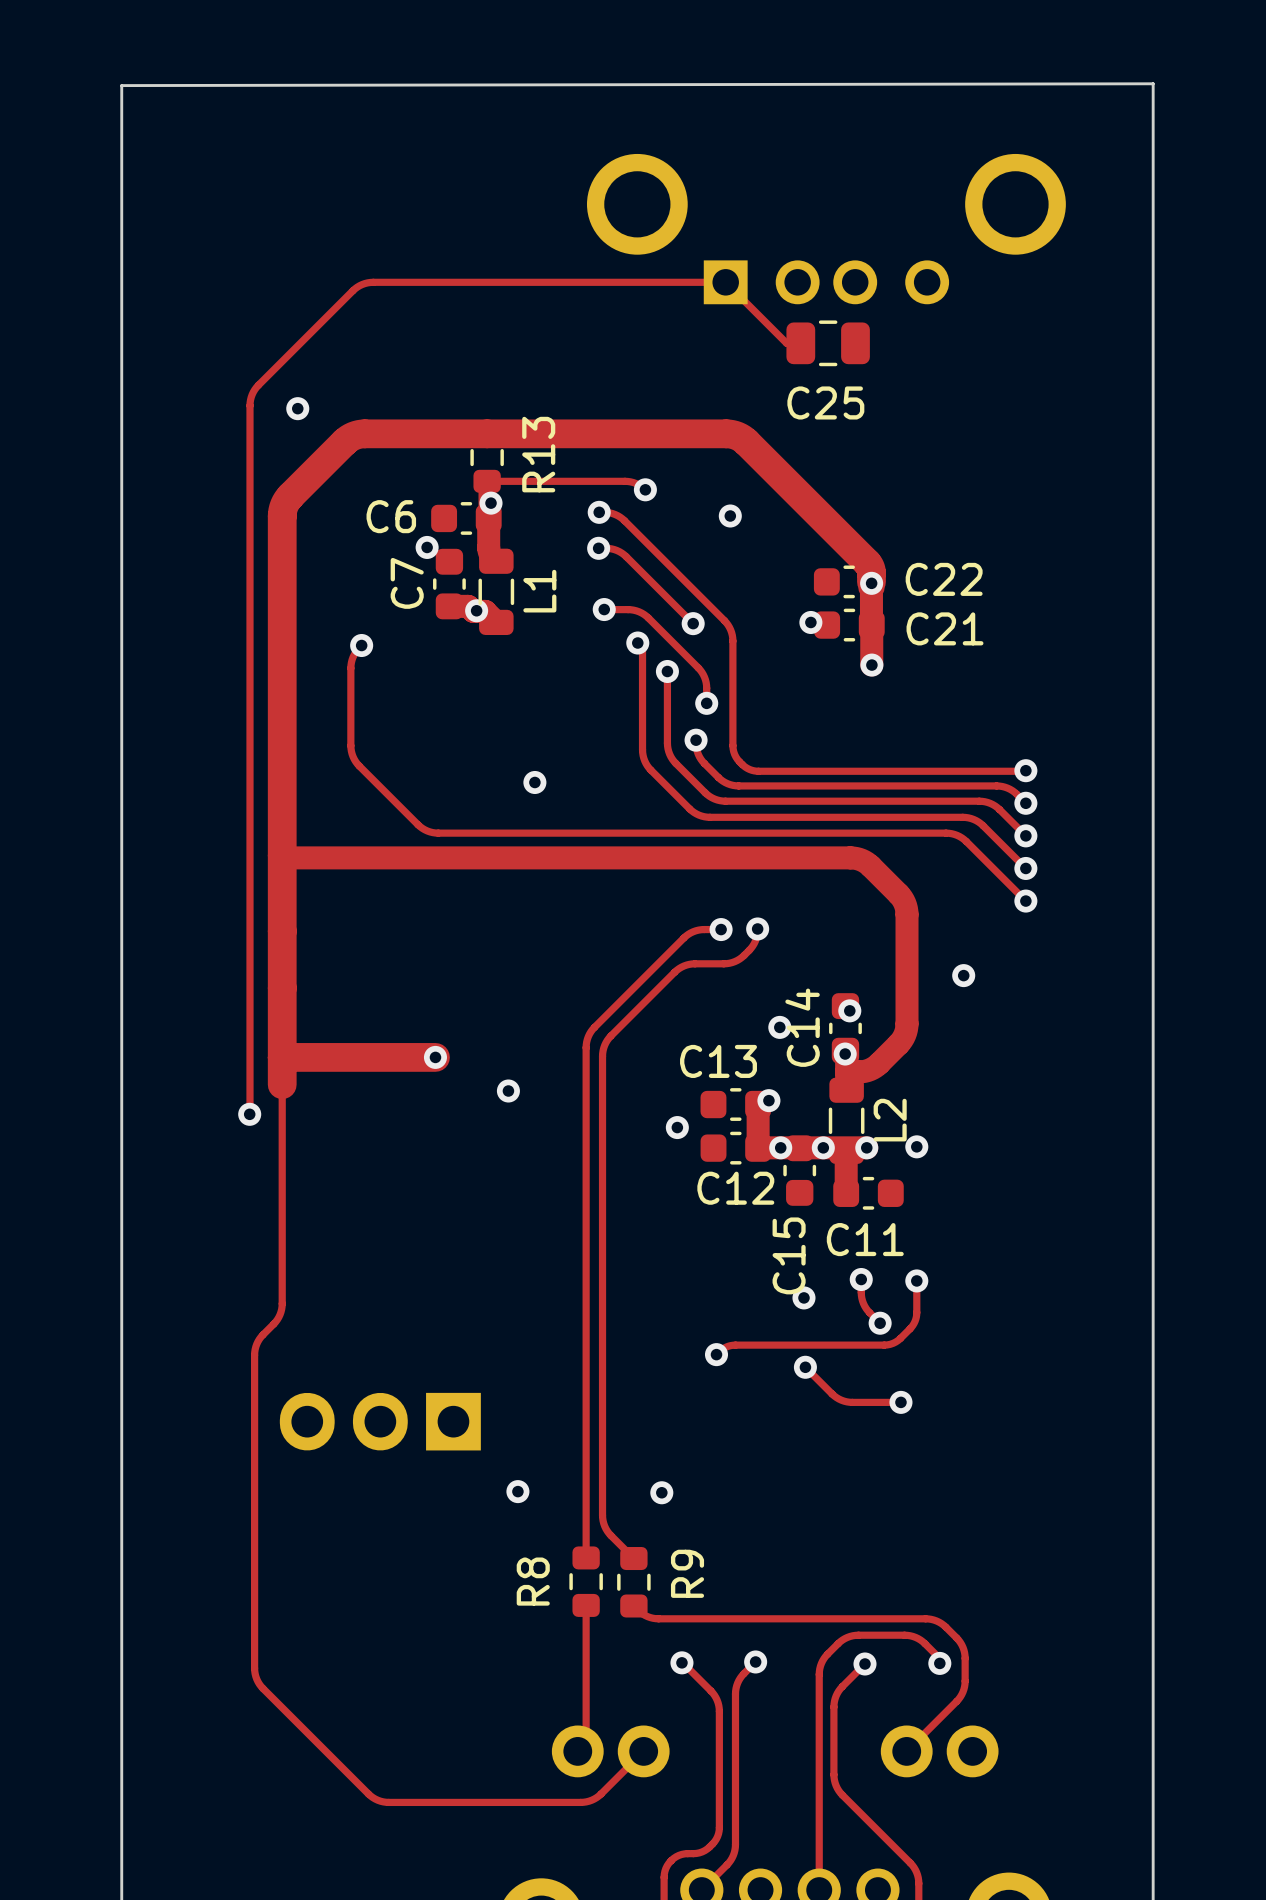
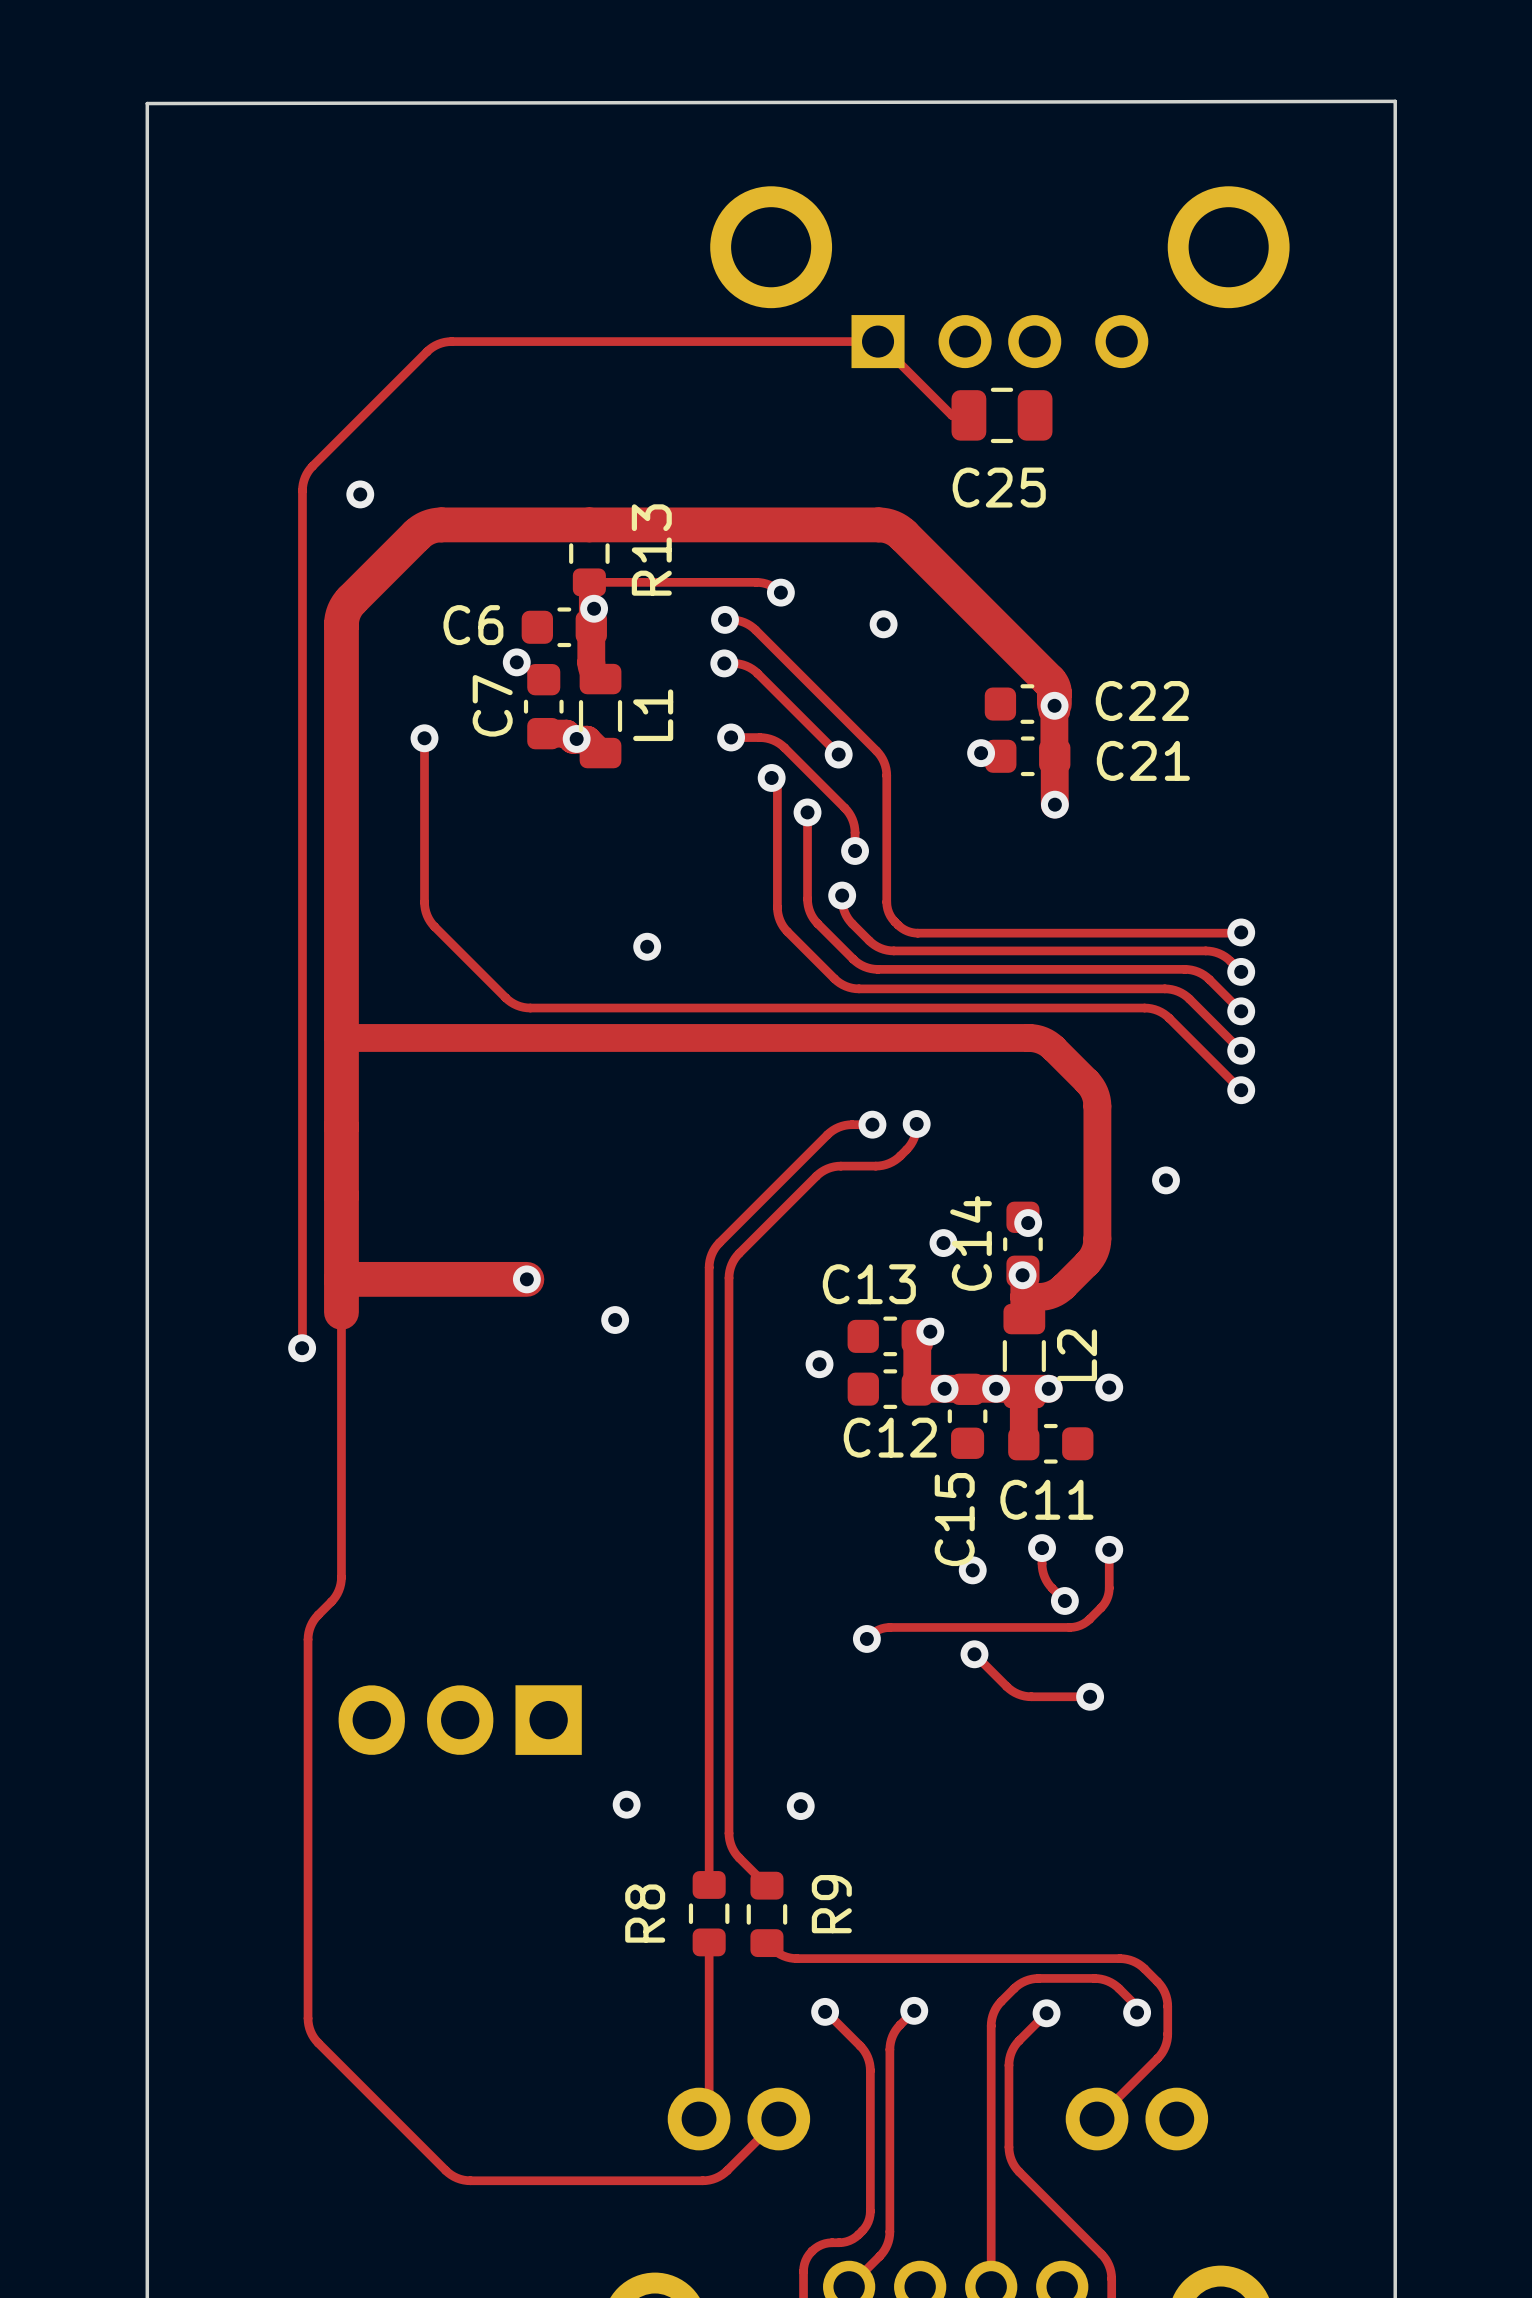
track: (361, 645) (354, 654) (350, 668) -> (424, 738) (424, 808)
via position: (361, 645) -> (424, 738)

